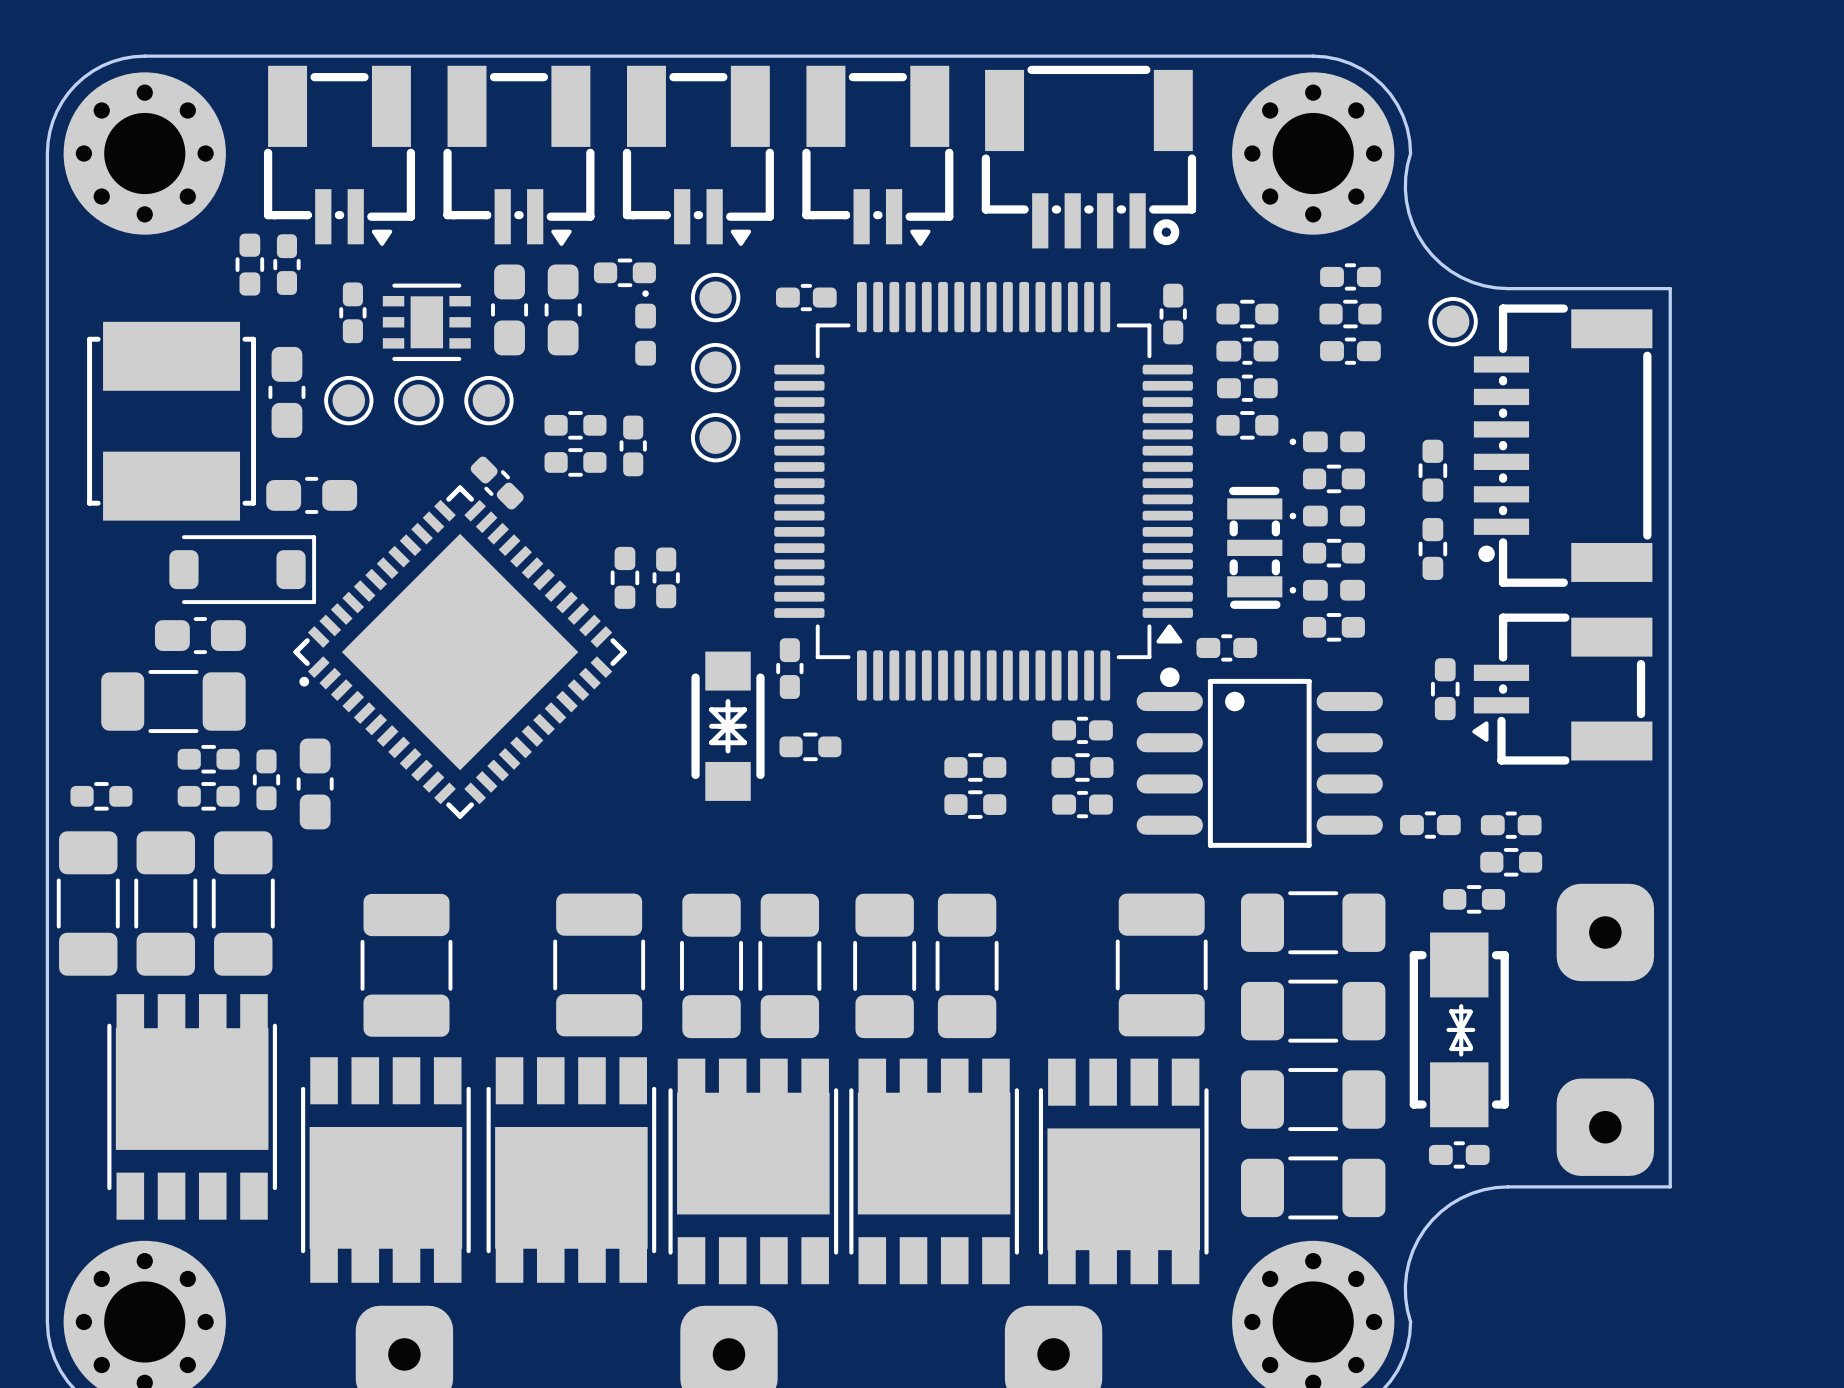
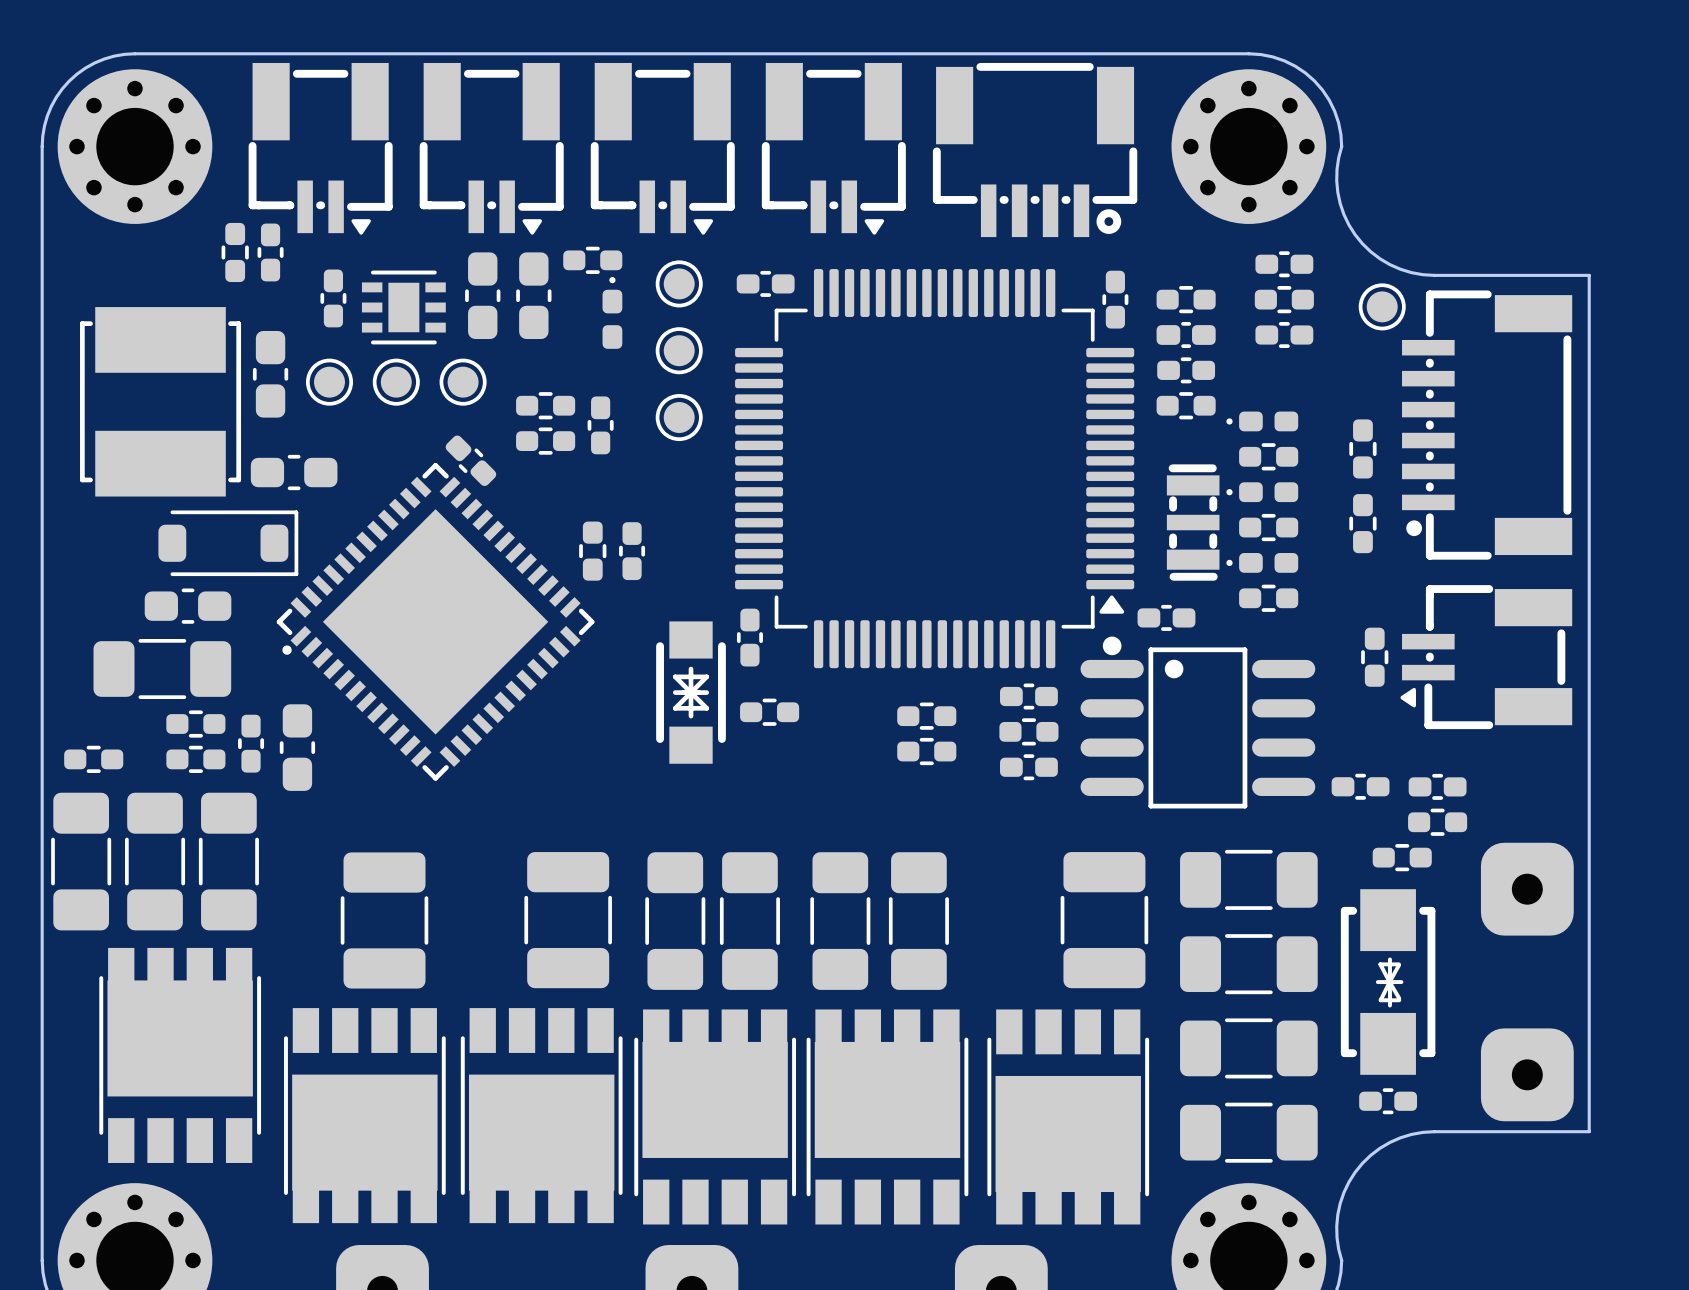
part: none -> (926, 716)
part: (975, 767) -> none
part: none -> (926, 751)
part: (975, 804) -> none

